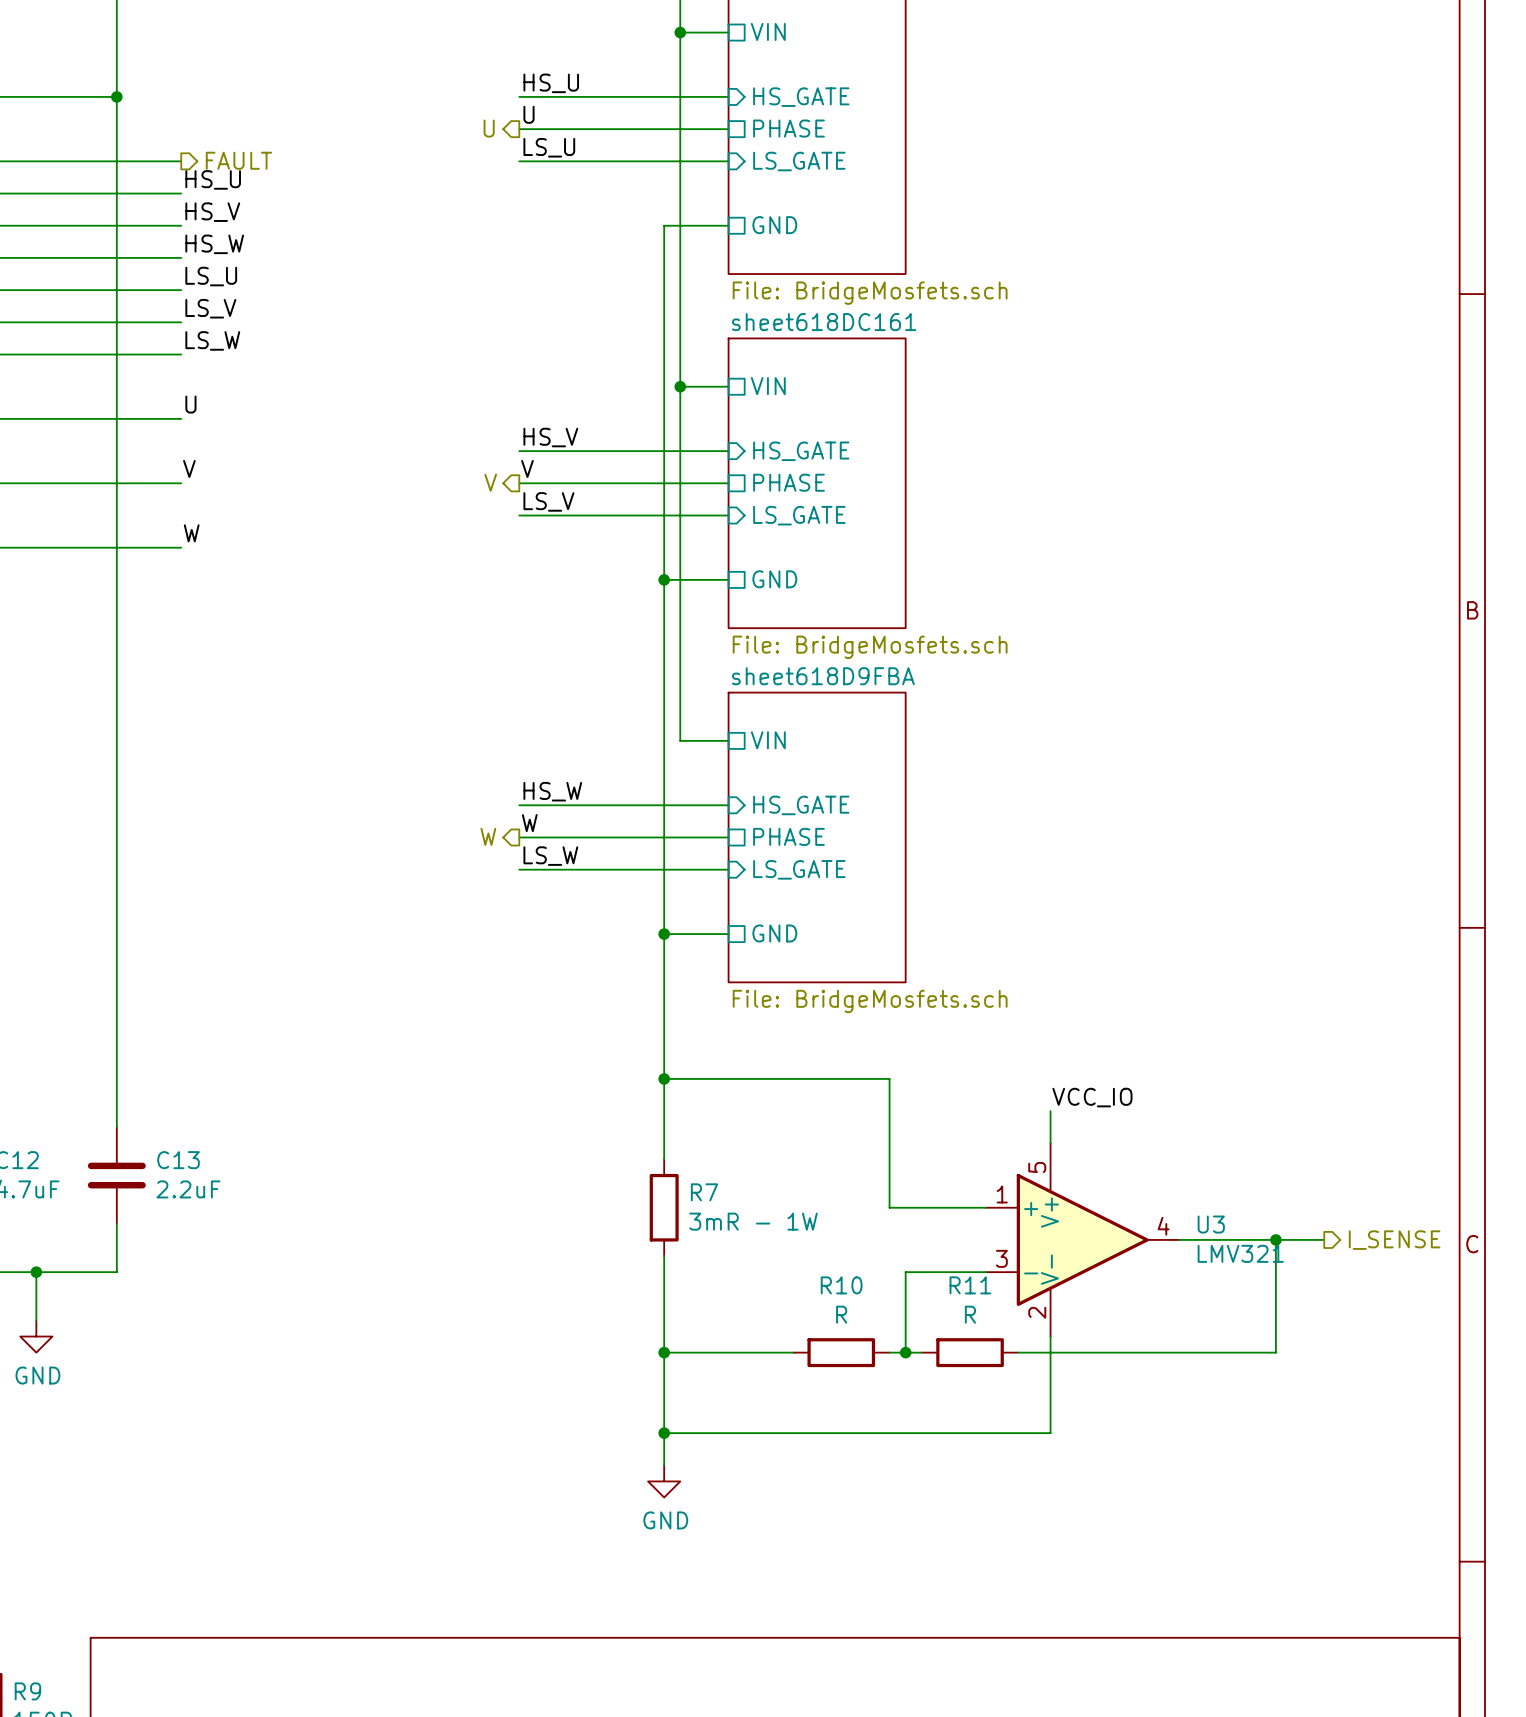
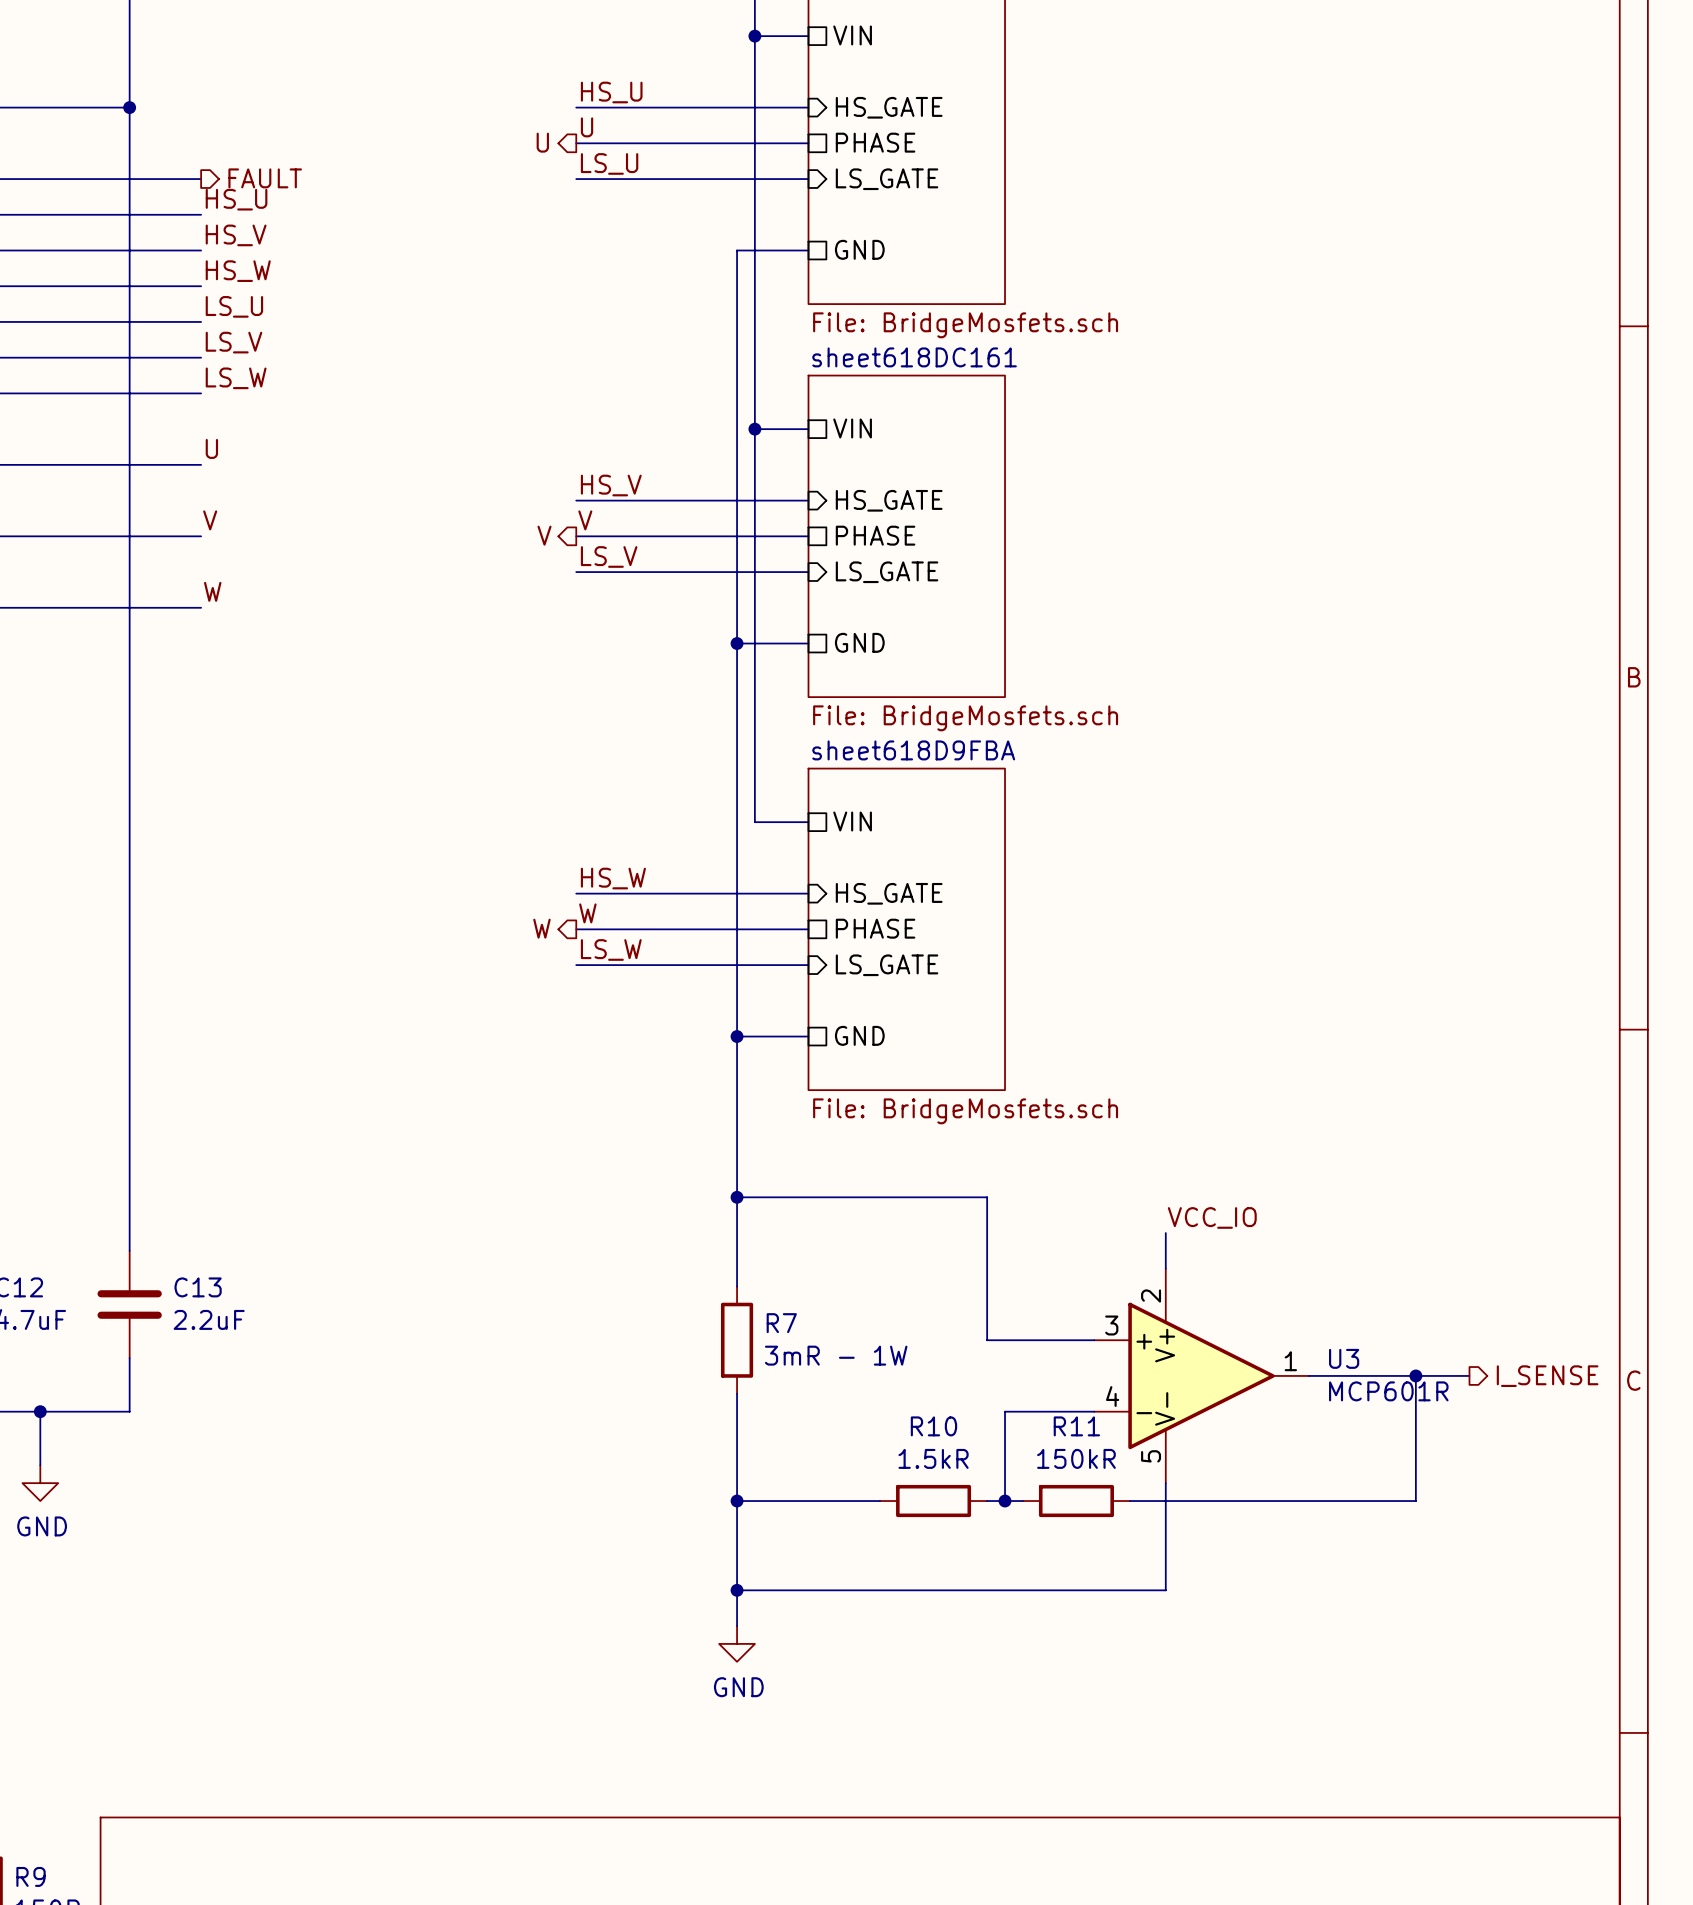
U3 pin number: 5 (1037, 1167) -> 2 (1151, 1296)
U3 pin number: 1 (1002, 1194) -> 3 (1111, 1325)
U3 pin number: 4 (1163, 1226) -> 1 (1290, 1361)
U3 value: LMV321 (1240, 1253) -> MCP601R (1388, 1391)
U3 pin number: 3 (1001, 1258) -> 4 (1112, 1396)
U3 pin number: 2 (1037, 1312) -> 5 (1151, 1456)
R10 value: R (841, 1314) -> 1.5kR (933, 1458)
R11 value: R (970, 1314) -> 150kR (1076, 1458)

